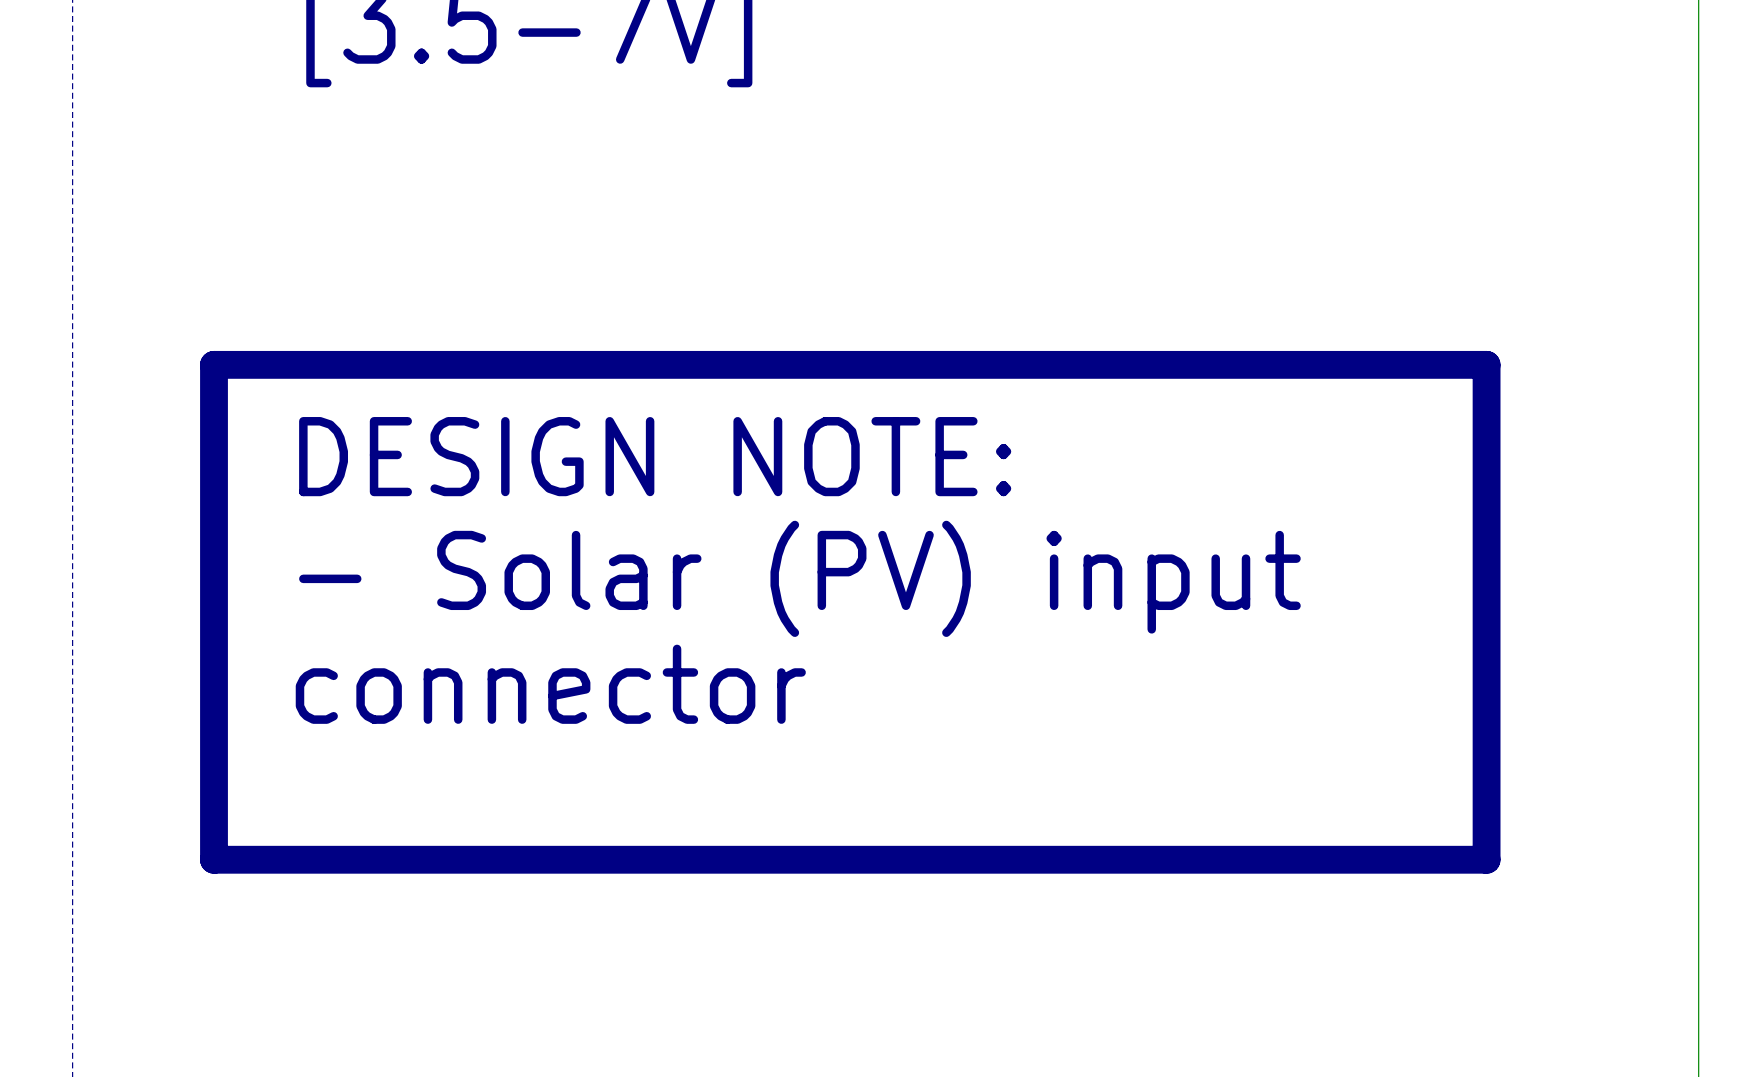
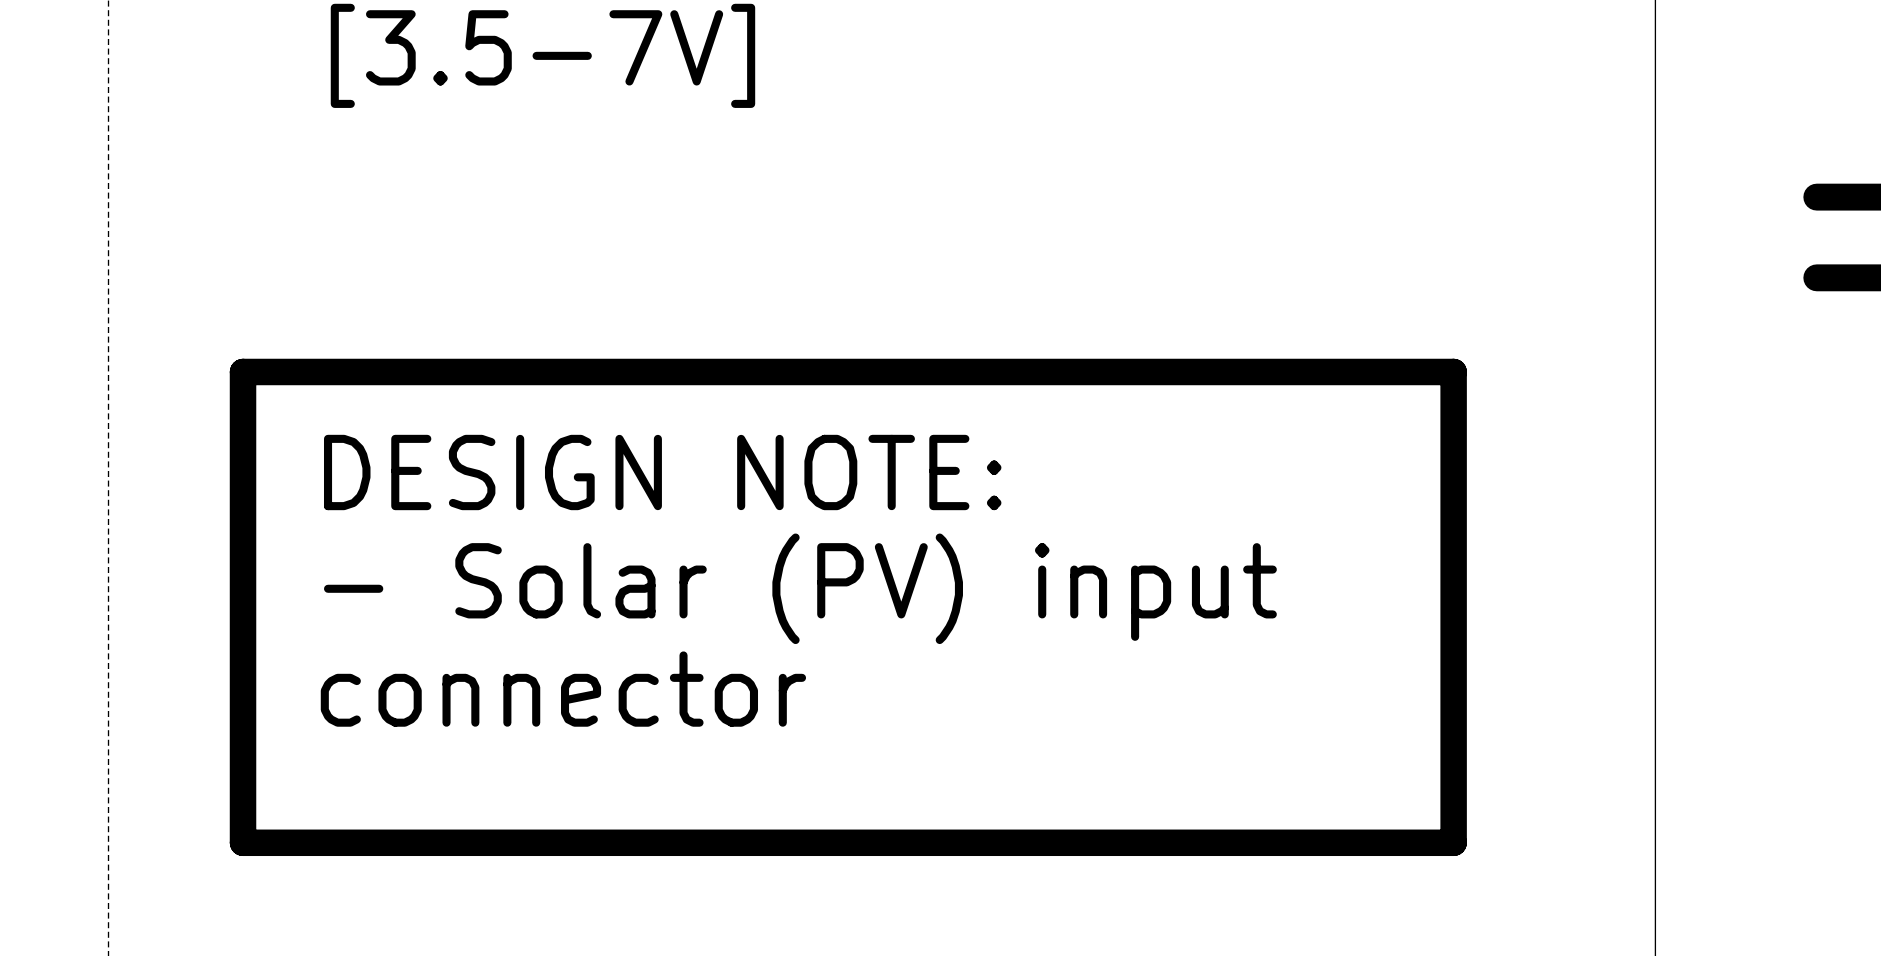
text position: DESIGN NOTE: (655, 456) -> DESIGN NOTE: (662, 472)
text position: - Solar (PV) input (799, 578) -> - Solar (PV) input (800, 588)
text position: connector (550, 684) -> connector (563, 689)

